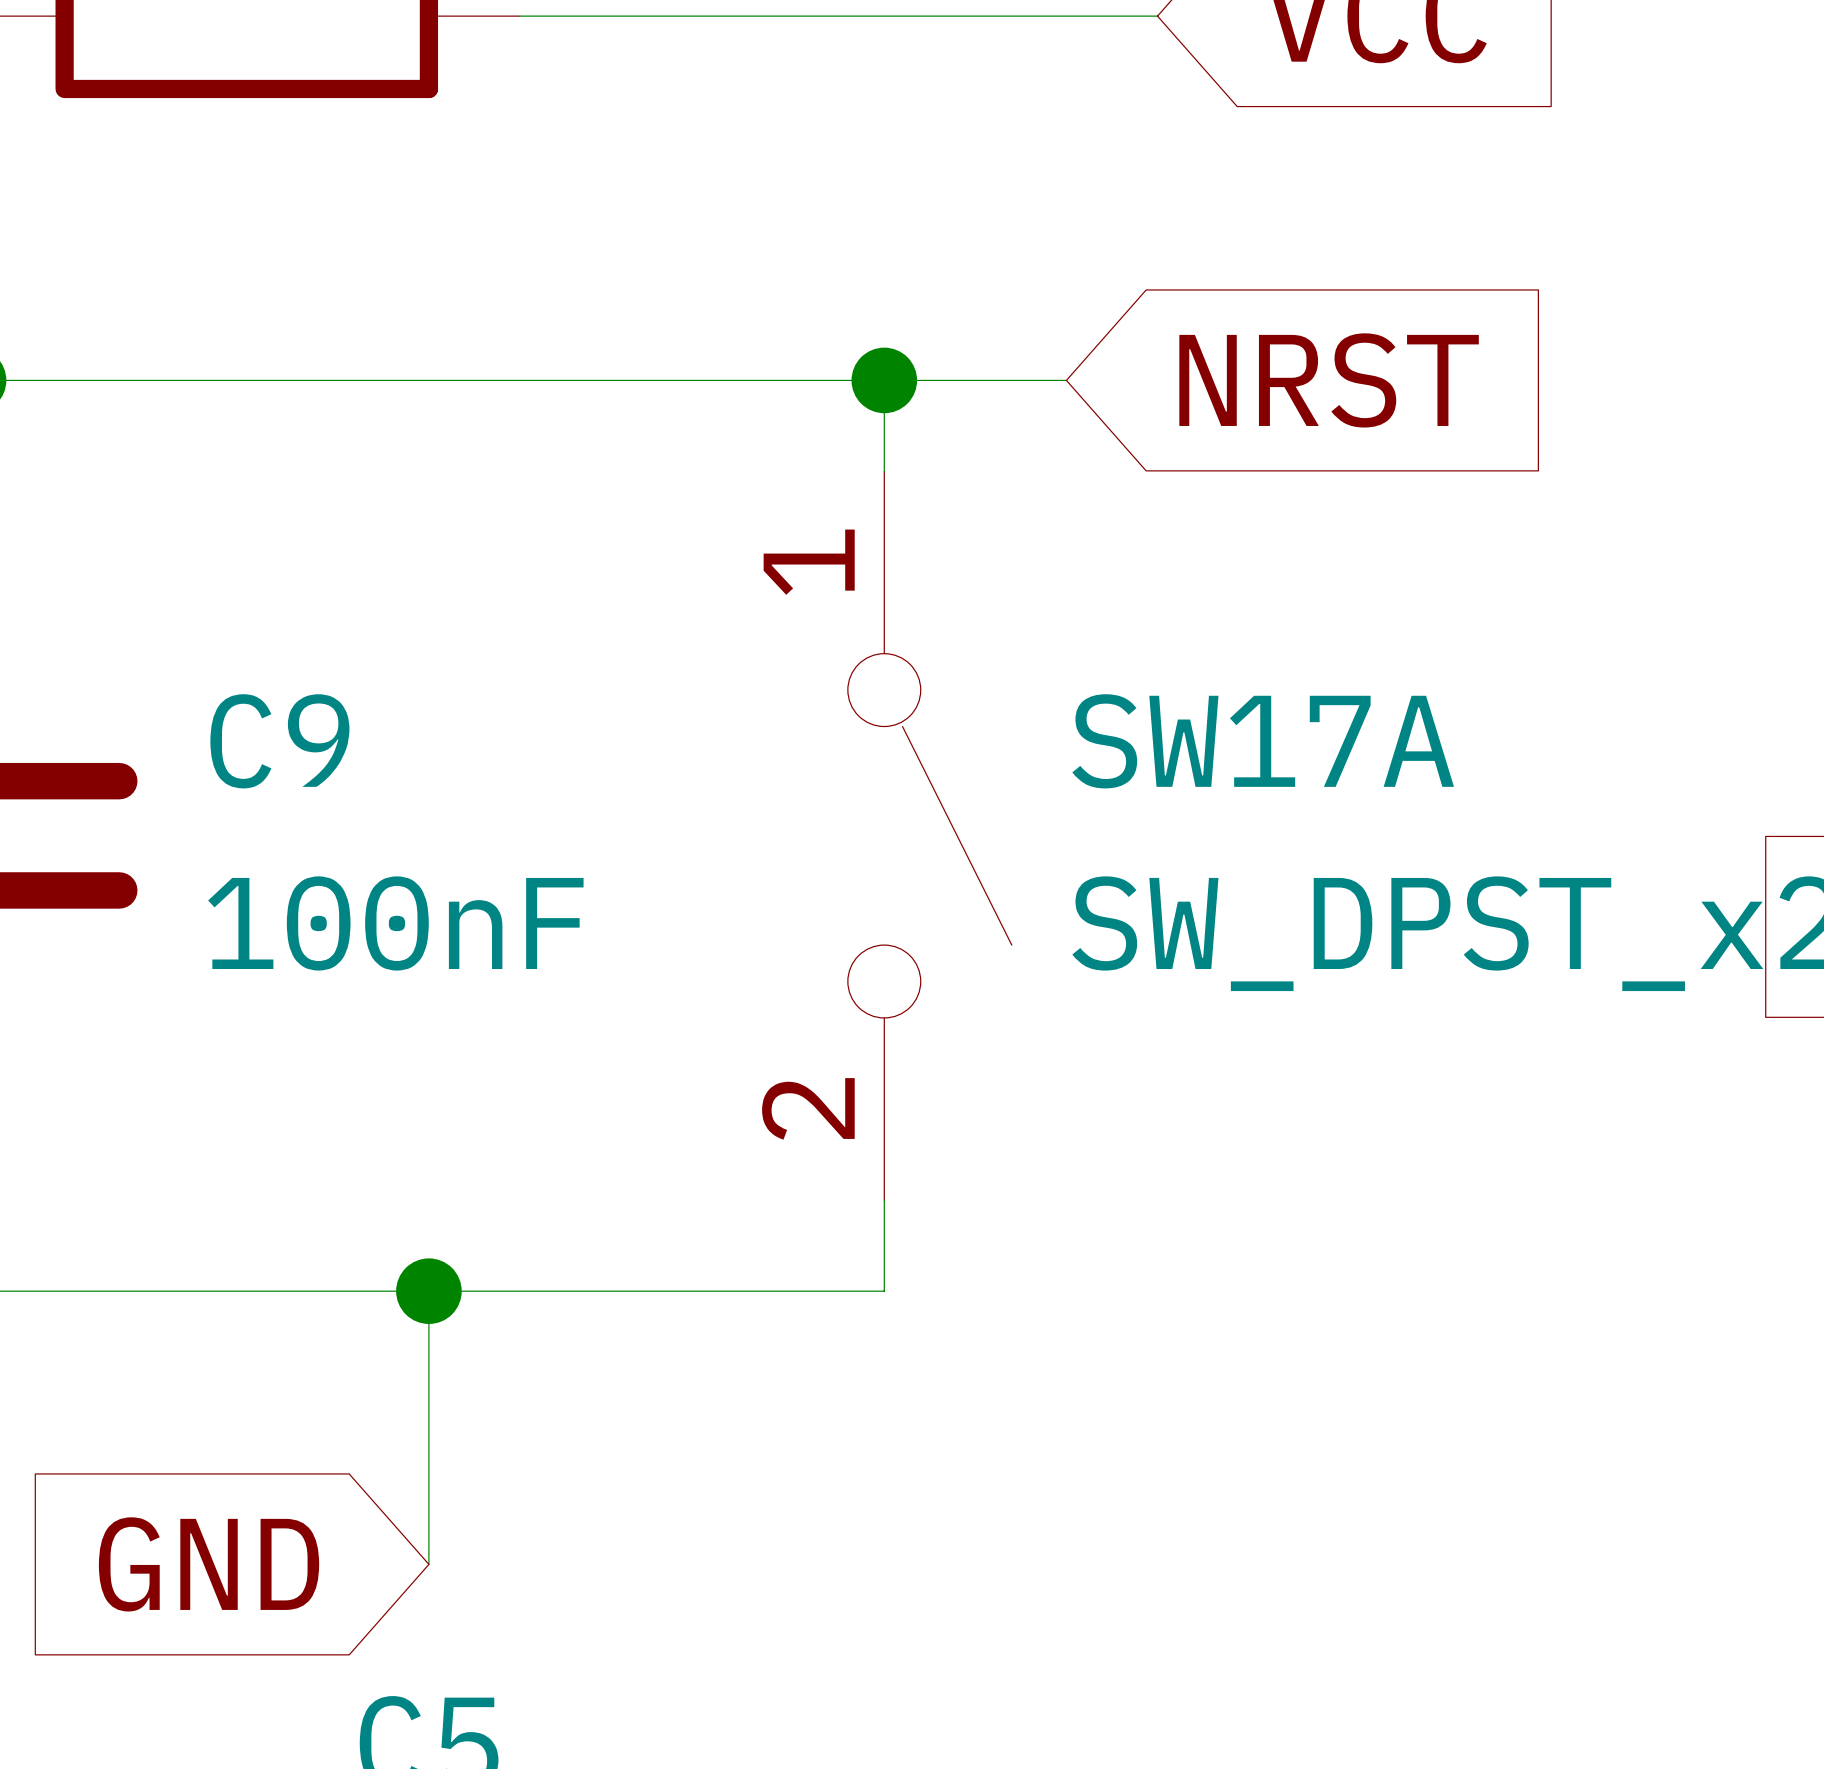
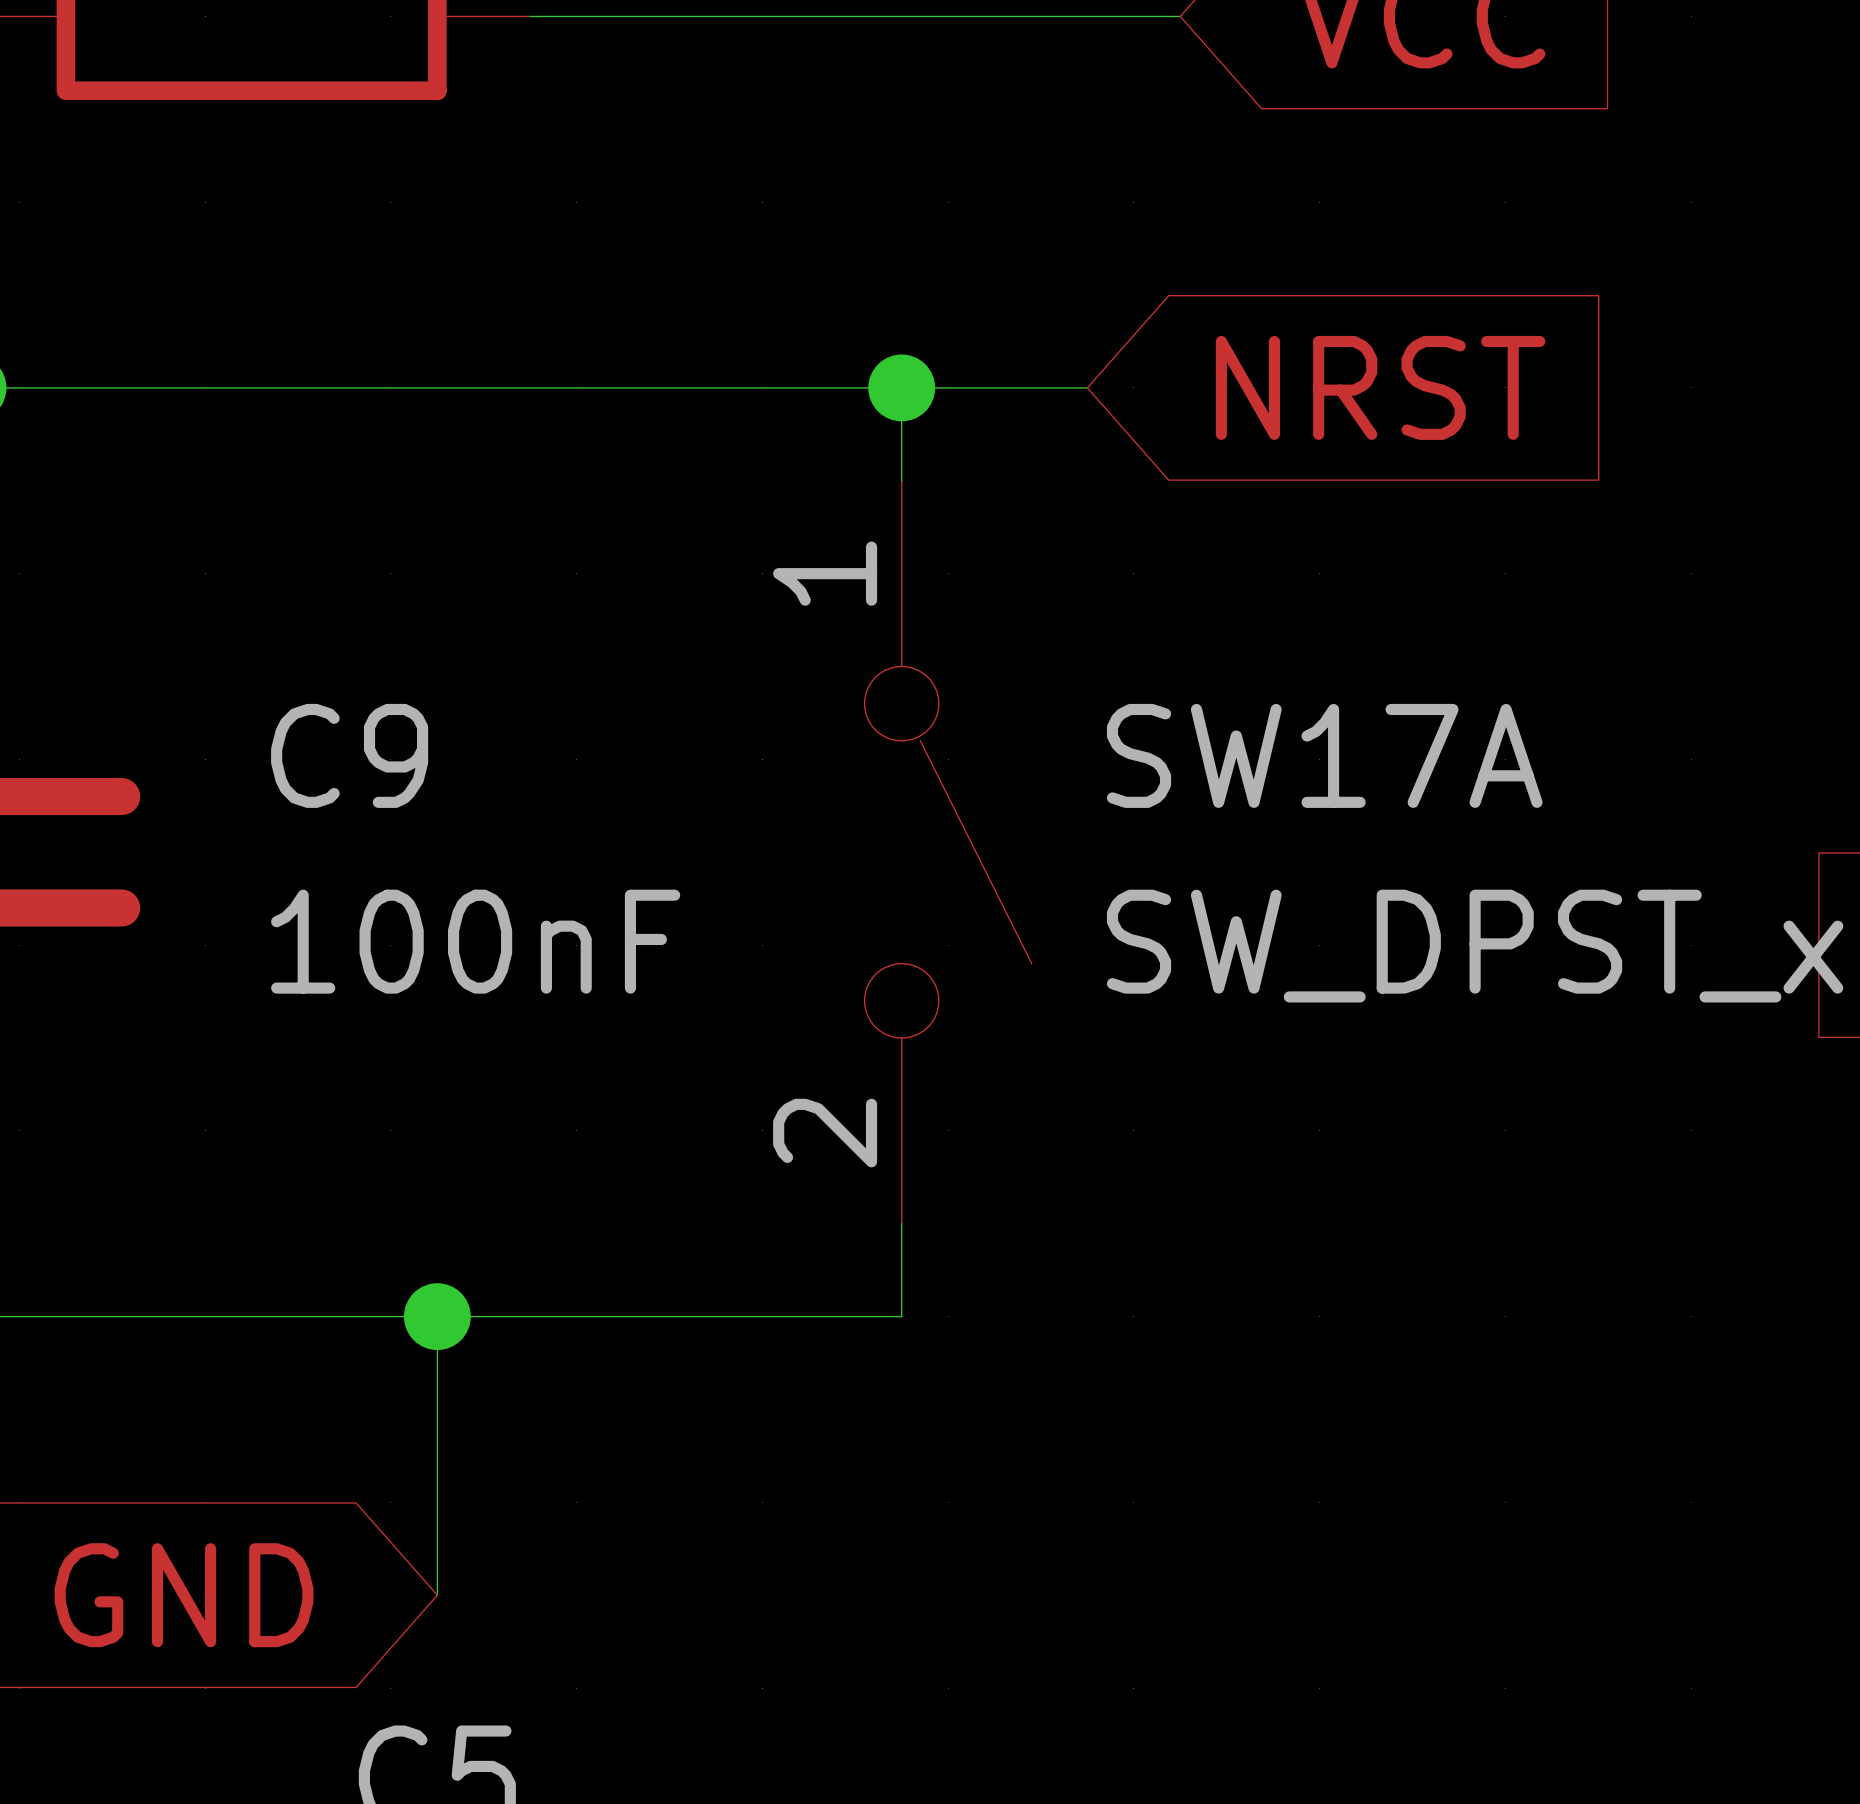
C9 name position: C9 (279, 741) -> C9 (349, 755)
C9 value position: 100nF (395, 923) -> 100nF (475, 941)

